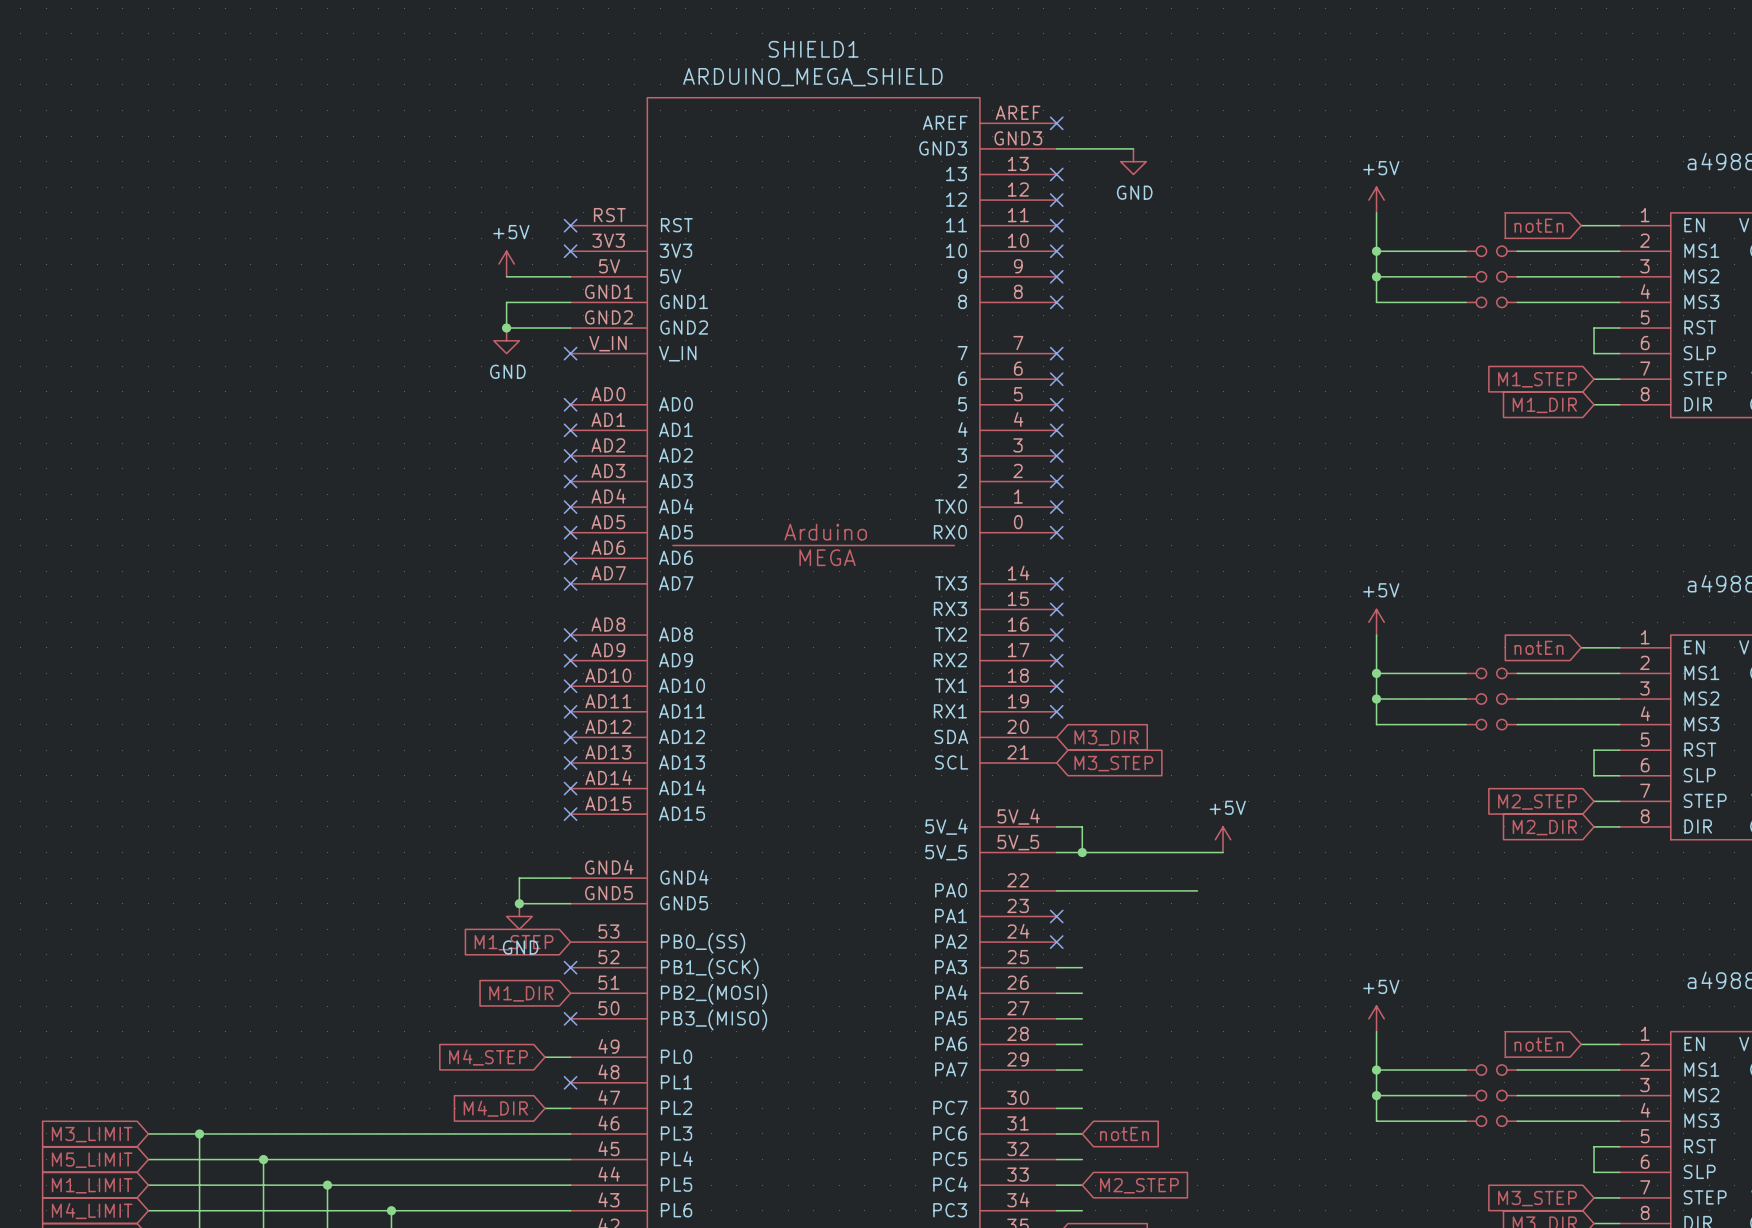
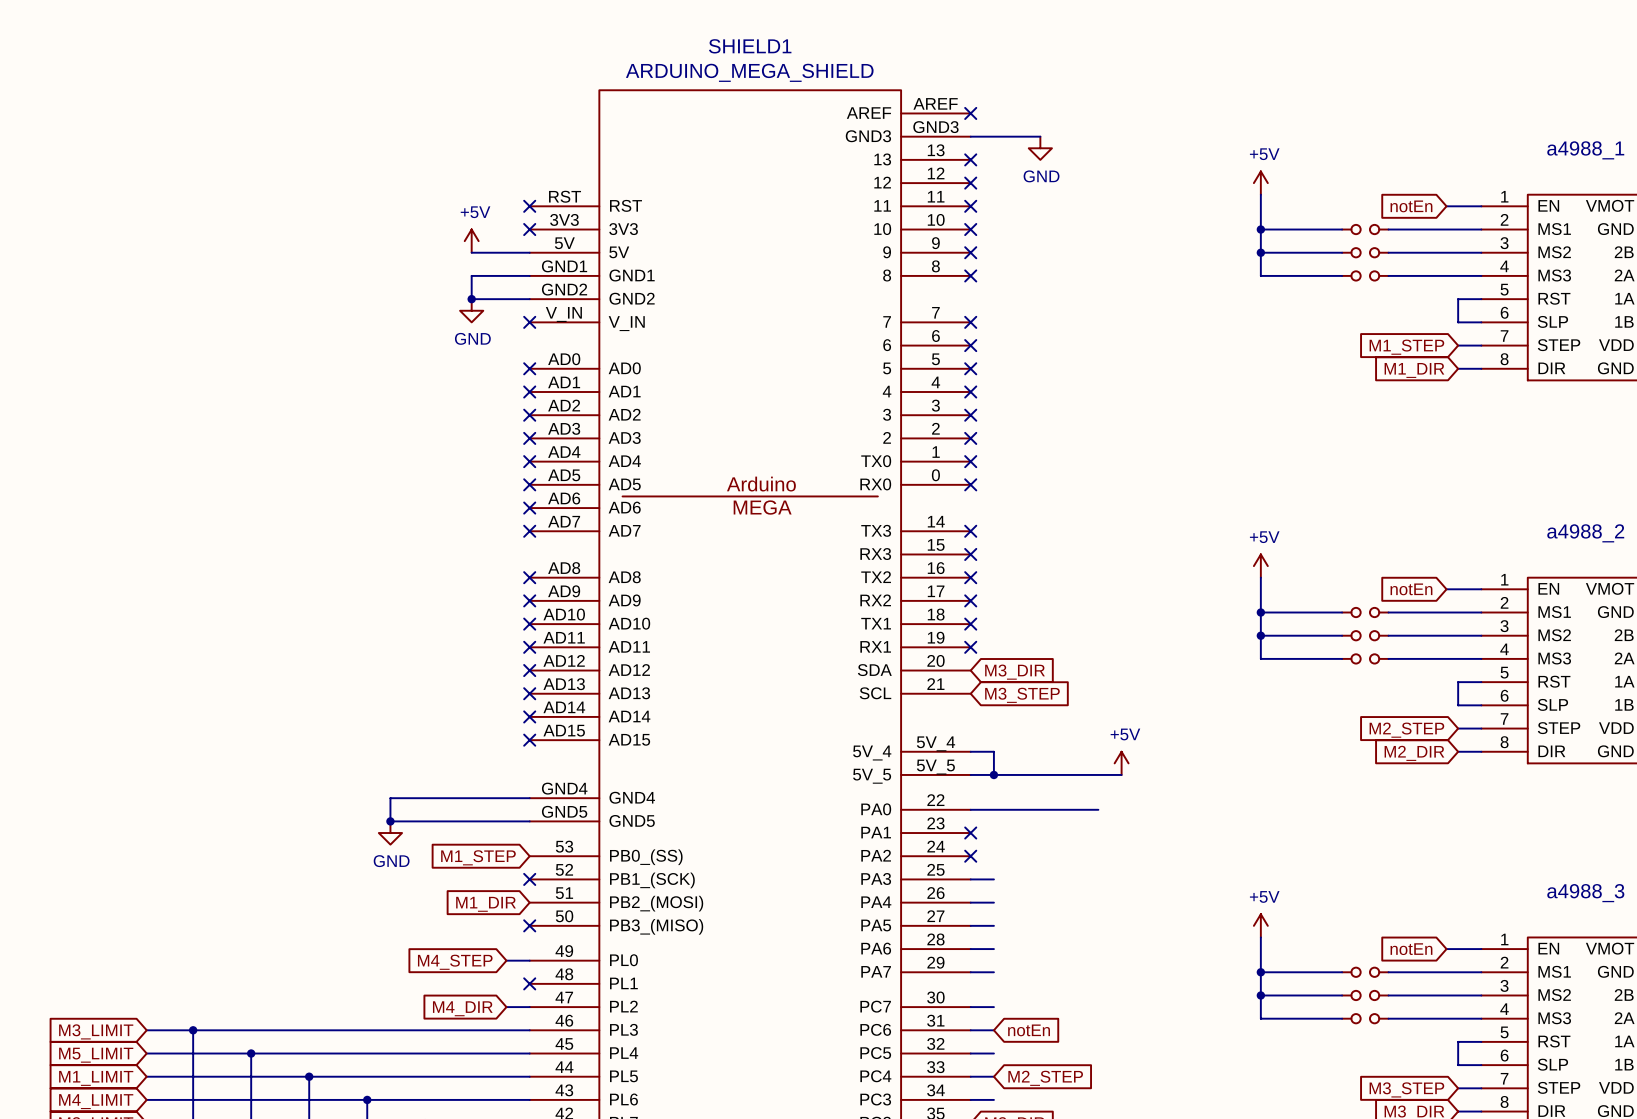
wire: (519, 878) (519, 903) -> (483, 798) (390, 798) (390, 821) (483, 821)
junction: none -> (390, 821)
junction: (519, 903) -> none
power symbol position: GND (519, 916) -> GND (390, 833)

